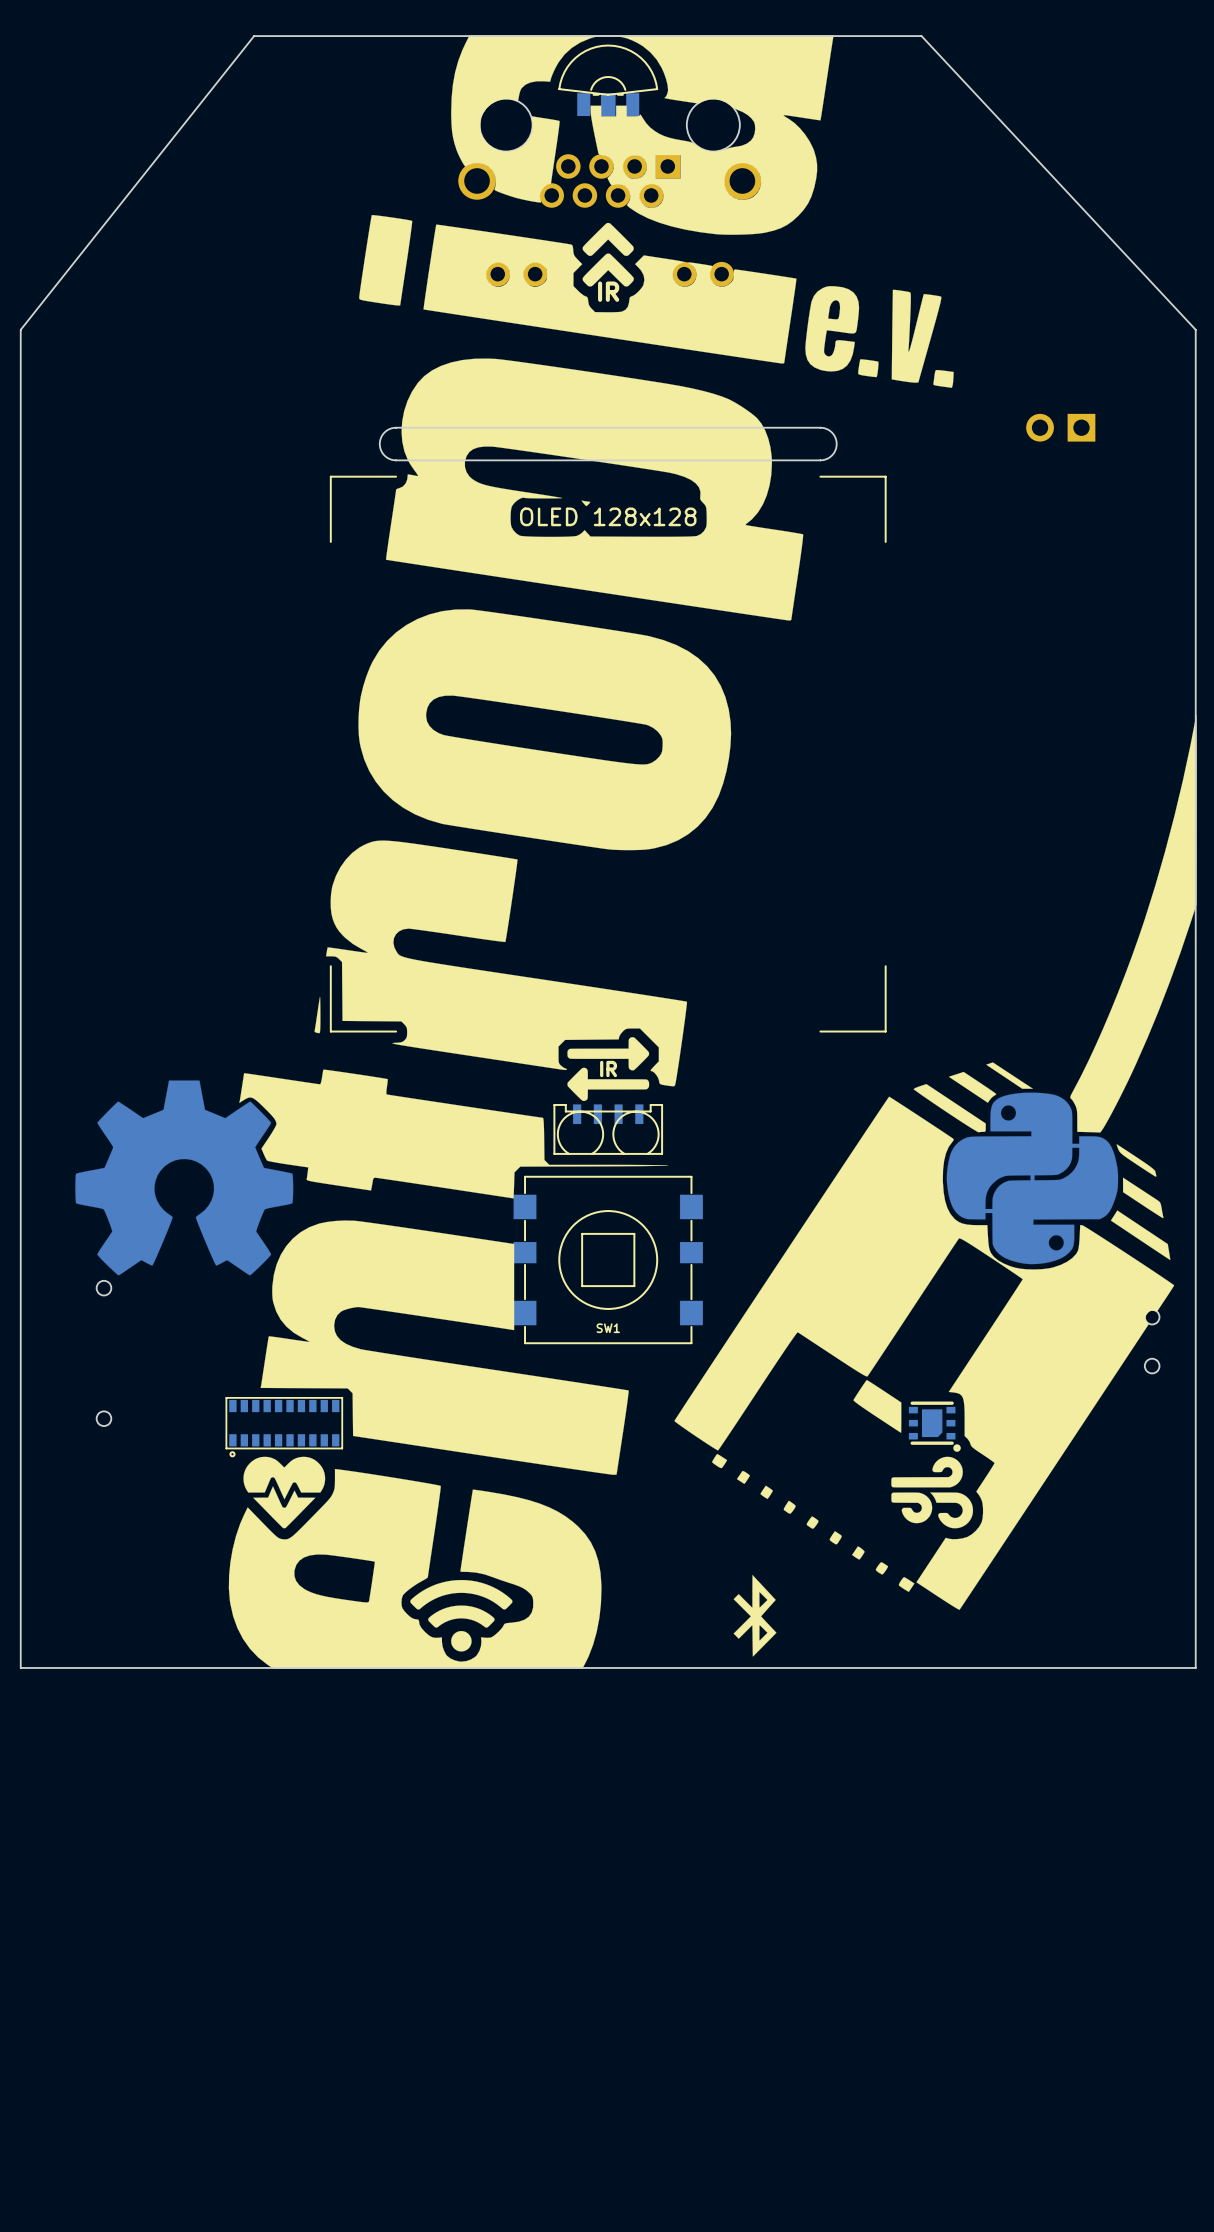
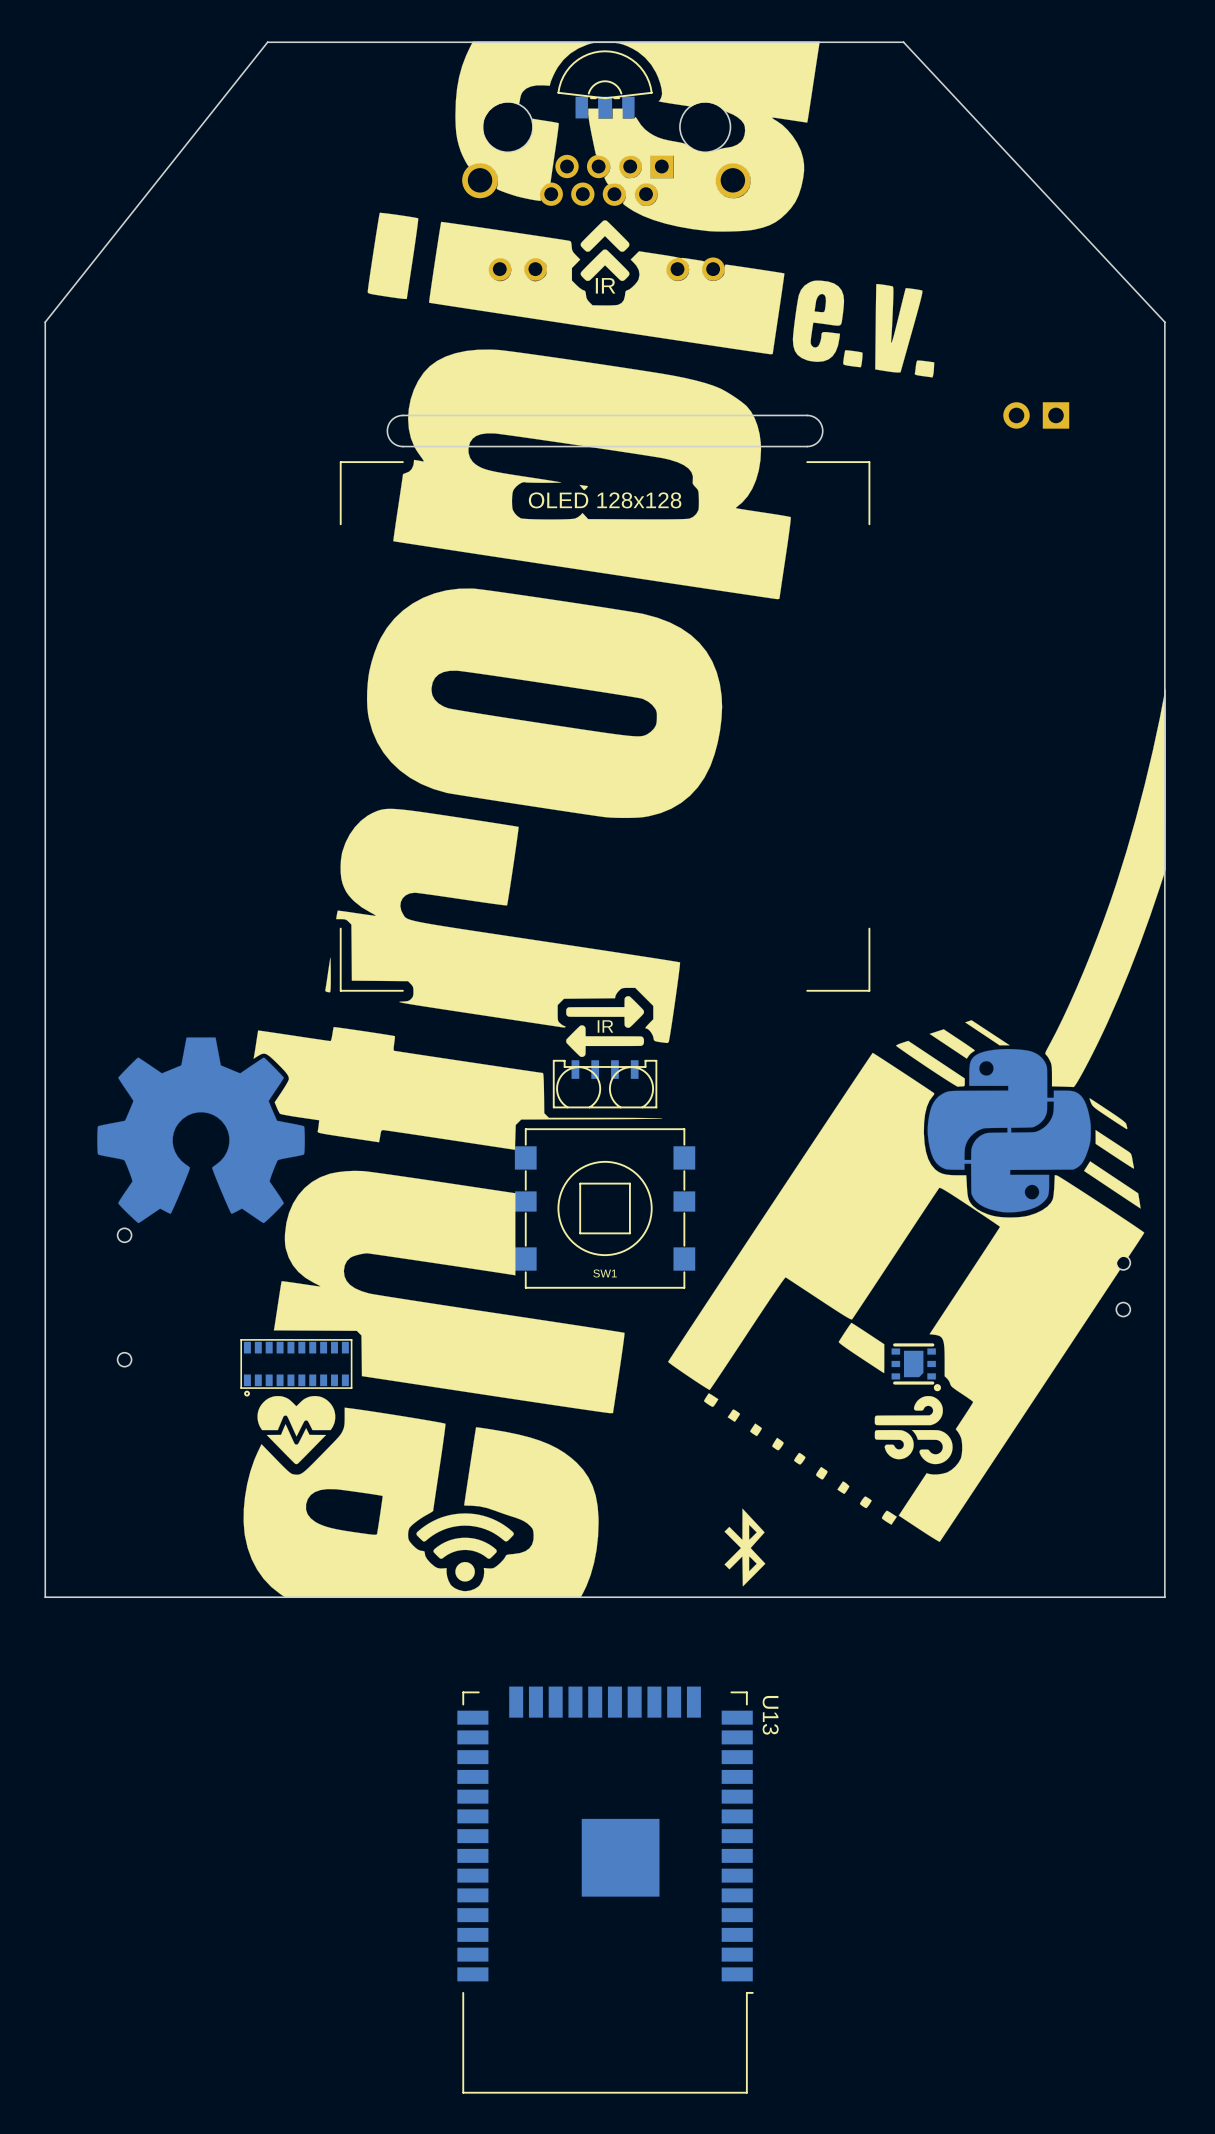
U13: none -> (605, 1890)

